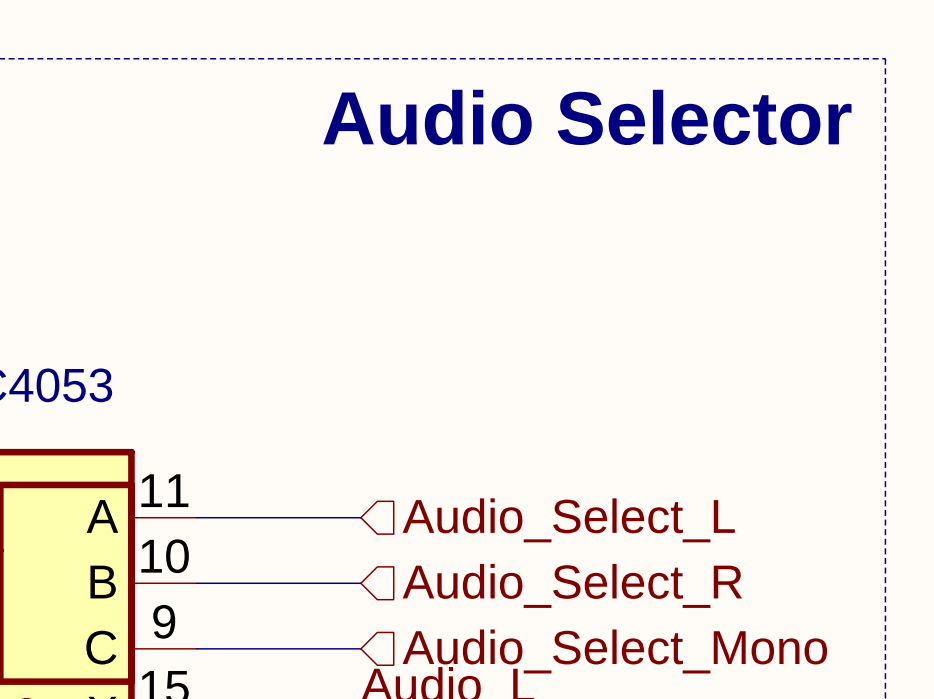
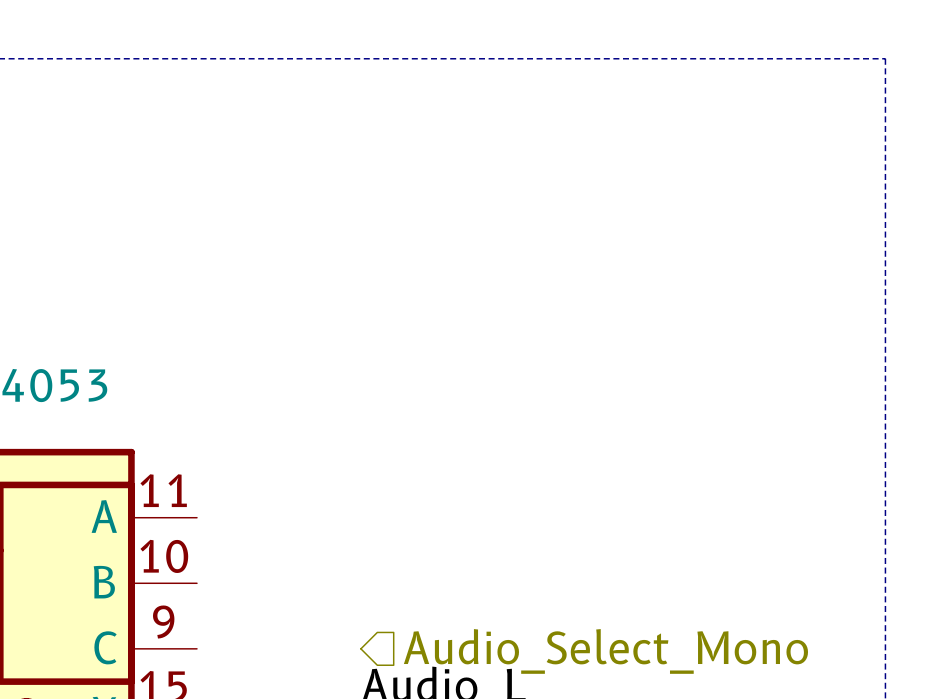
text: Audio Selector (587, 117) -> none
wire: (197, 517) (360, 517) -> none
hierarchical label: Audio_Select_L (568, 520) -> none
wire: (197, 583) (360, 583) -> none
hierarchical label: Audio_Select_R (572, 585) -> none
wire: (197, 648) (360, 648) -> none

